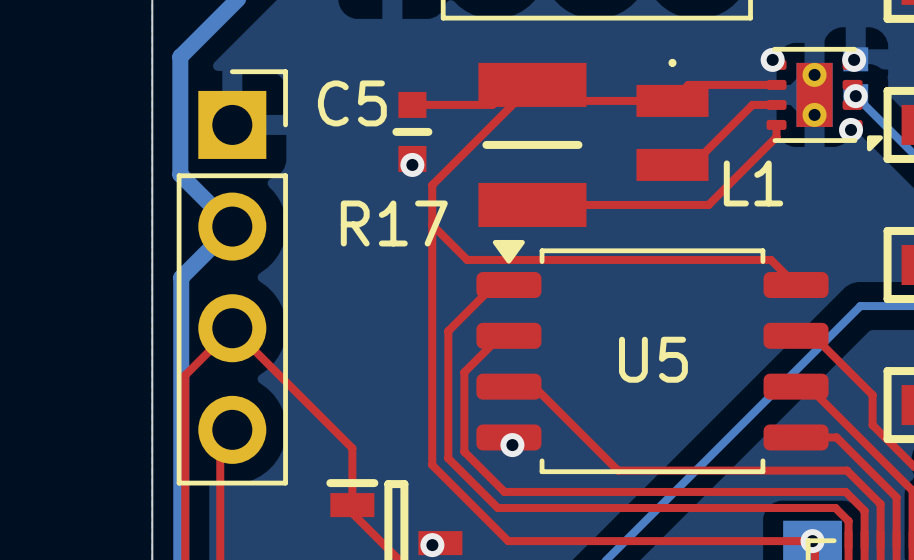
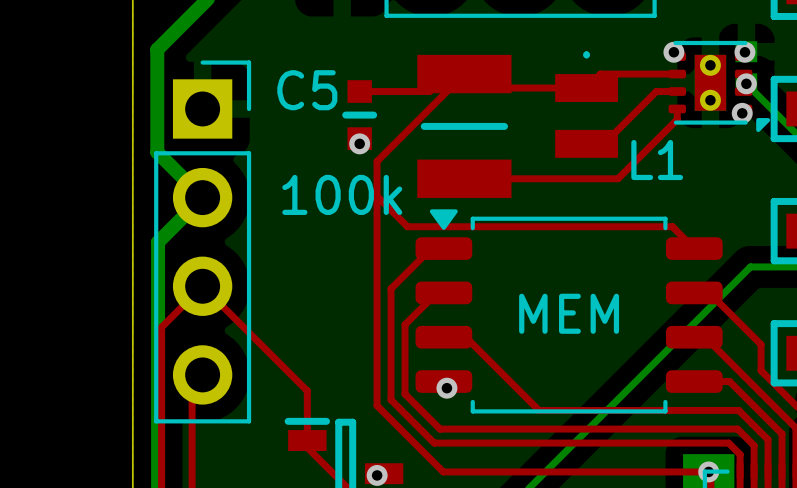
R17 name: R17 (394, 223) -> 100k (342, 194)
U5 name: U5 (653, 359) -> MEM (569, 313)

